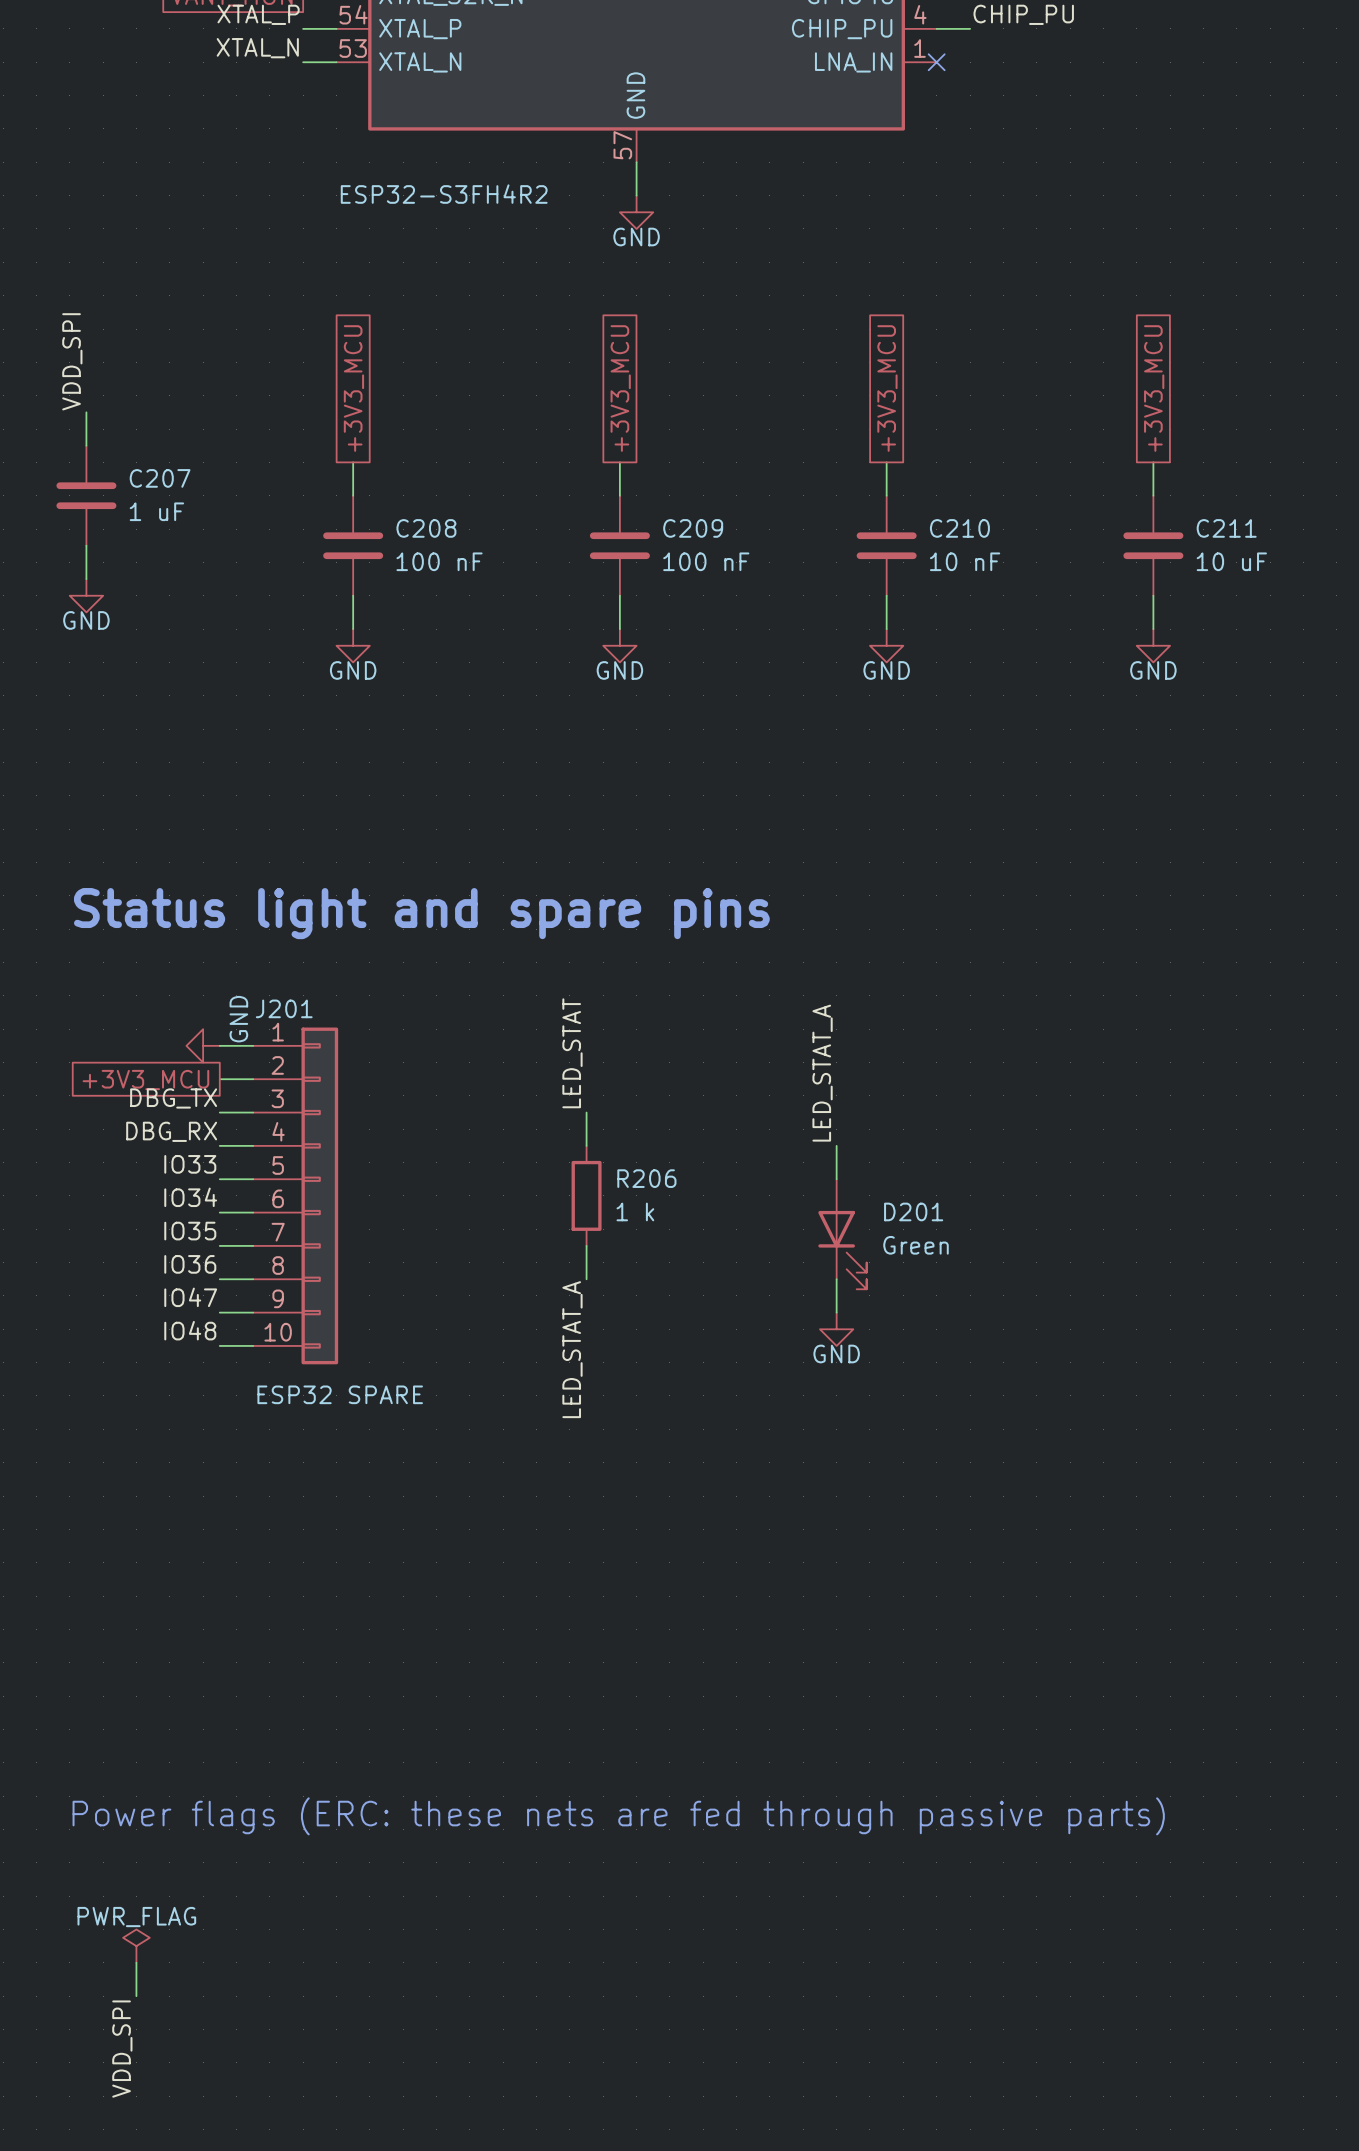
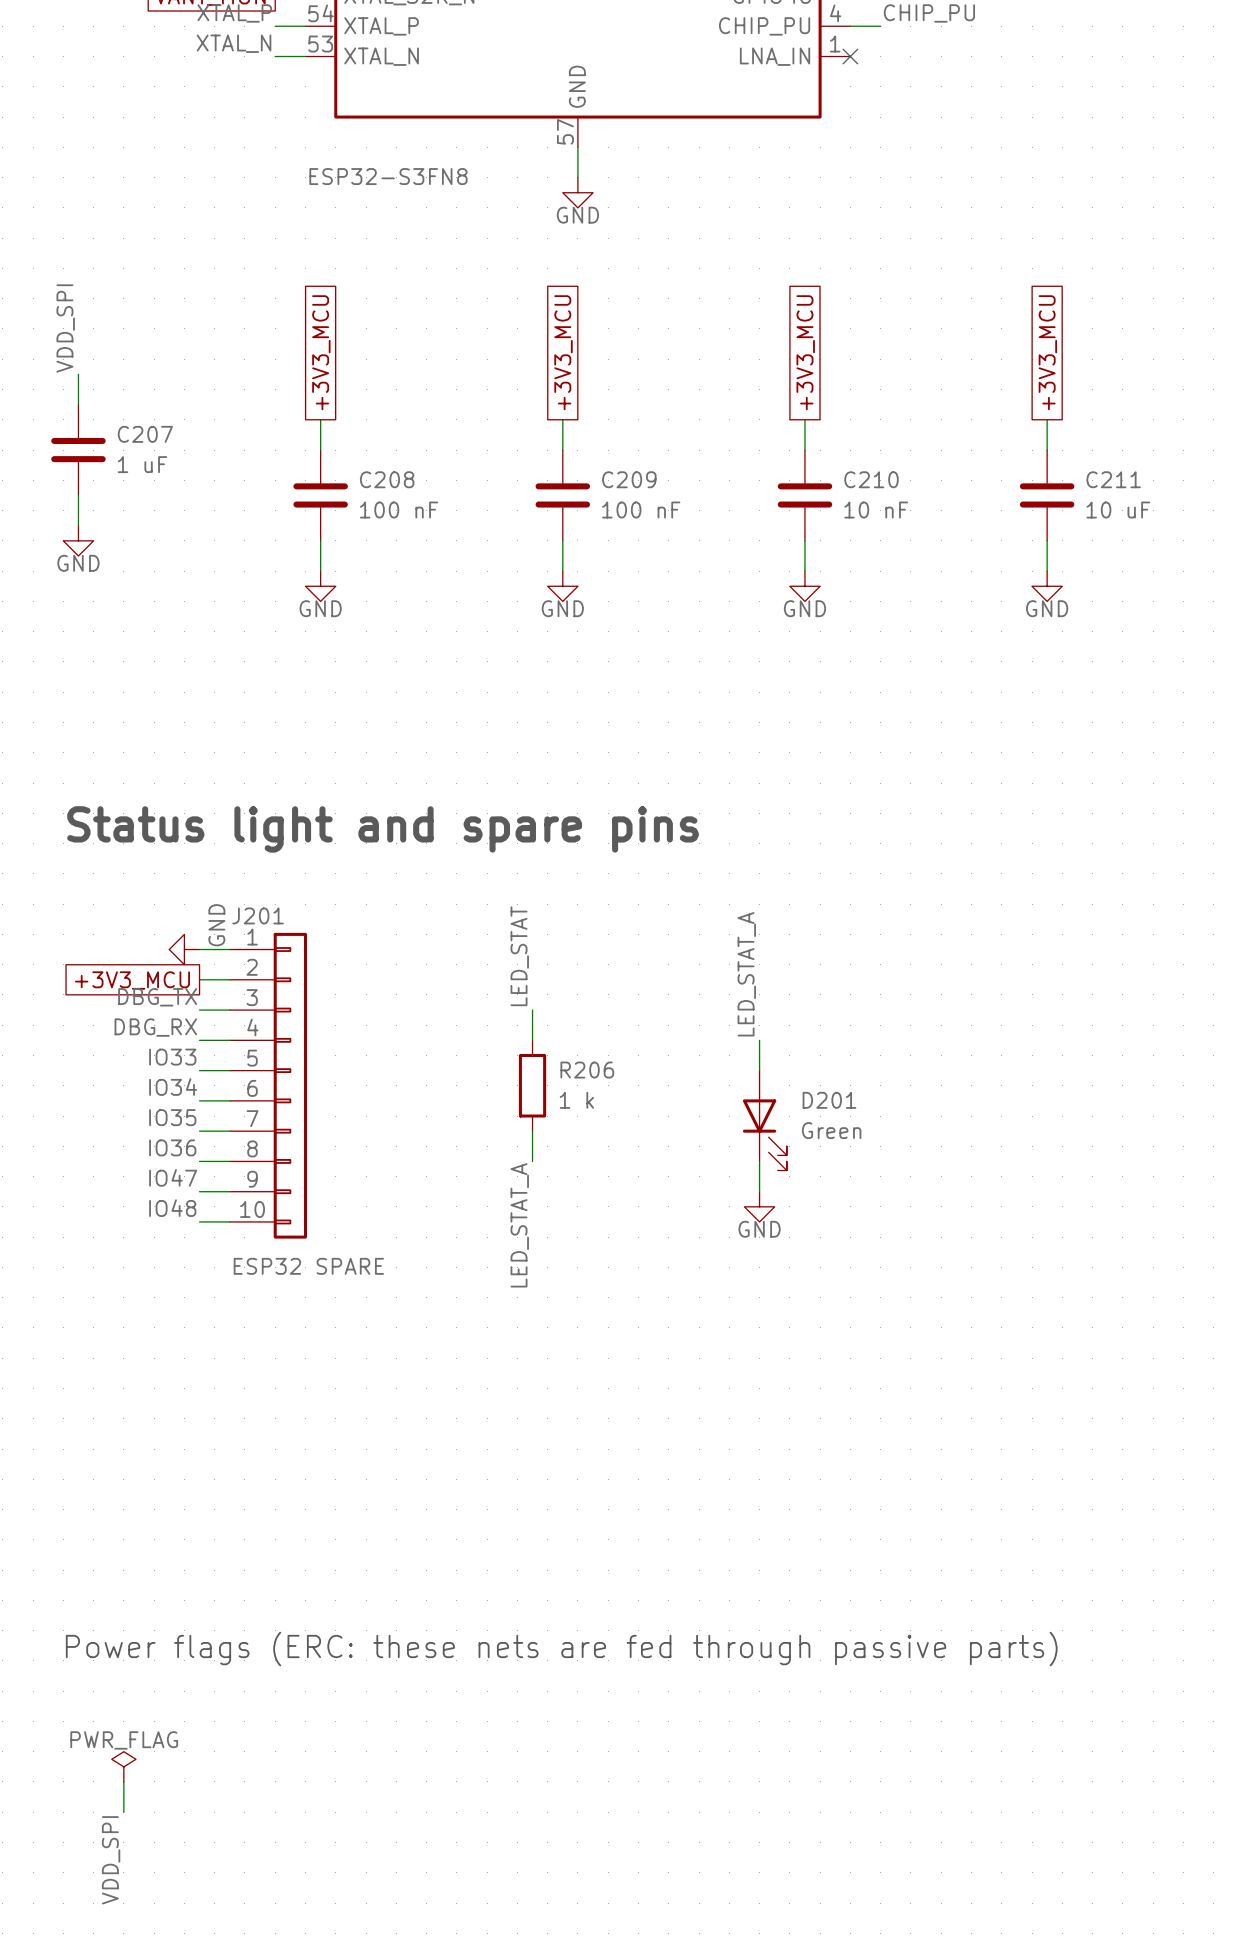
part value: ESP32-S3FH4R2 (444, 194) -> ESP32-S3FN8 (388, 176)

